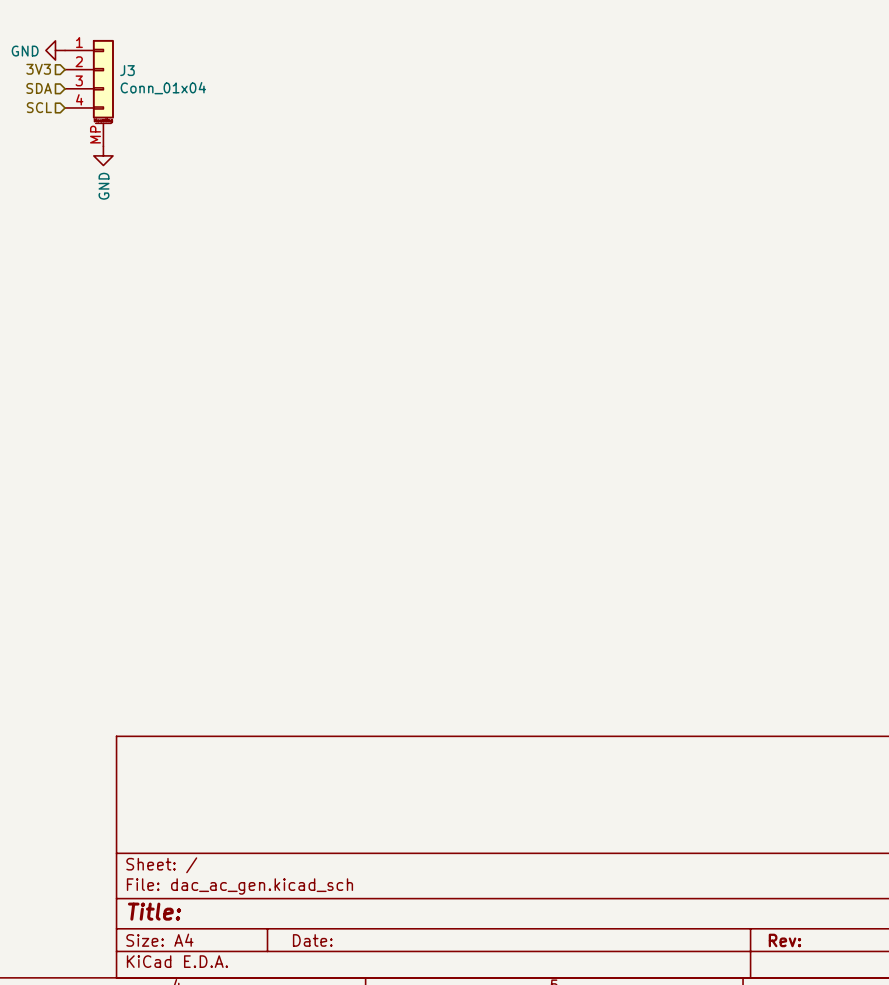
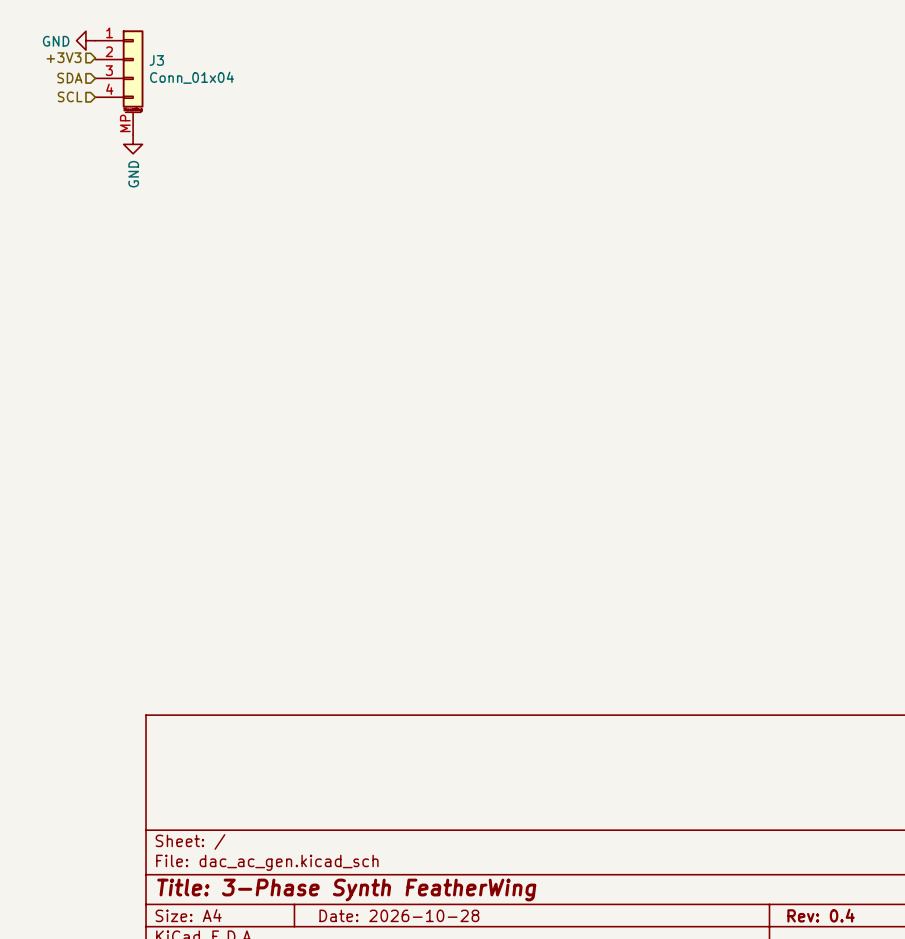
hierarchical label: 3V3 (38, 69) -> +3V3 (64, 57)
title block: Title: (154, 911) -> Title: 3-Phase Synth FeatherWing (346, 890)
title block: Date: (312, 940) -> Date: 2026-10-28 (399, 915)
title block: Rev: (784, 940) -> Rev: 0.4 (821, 915)

